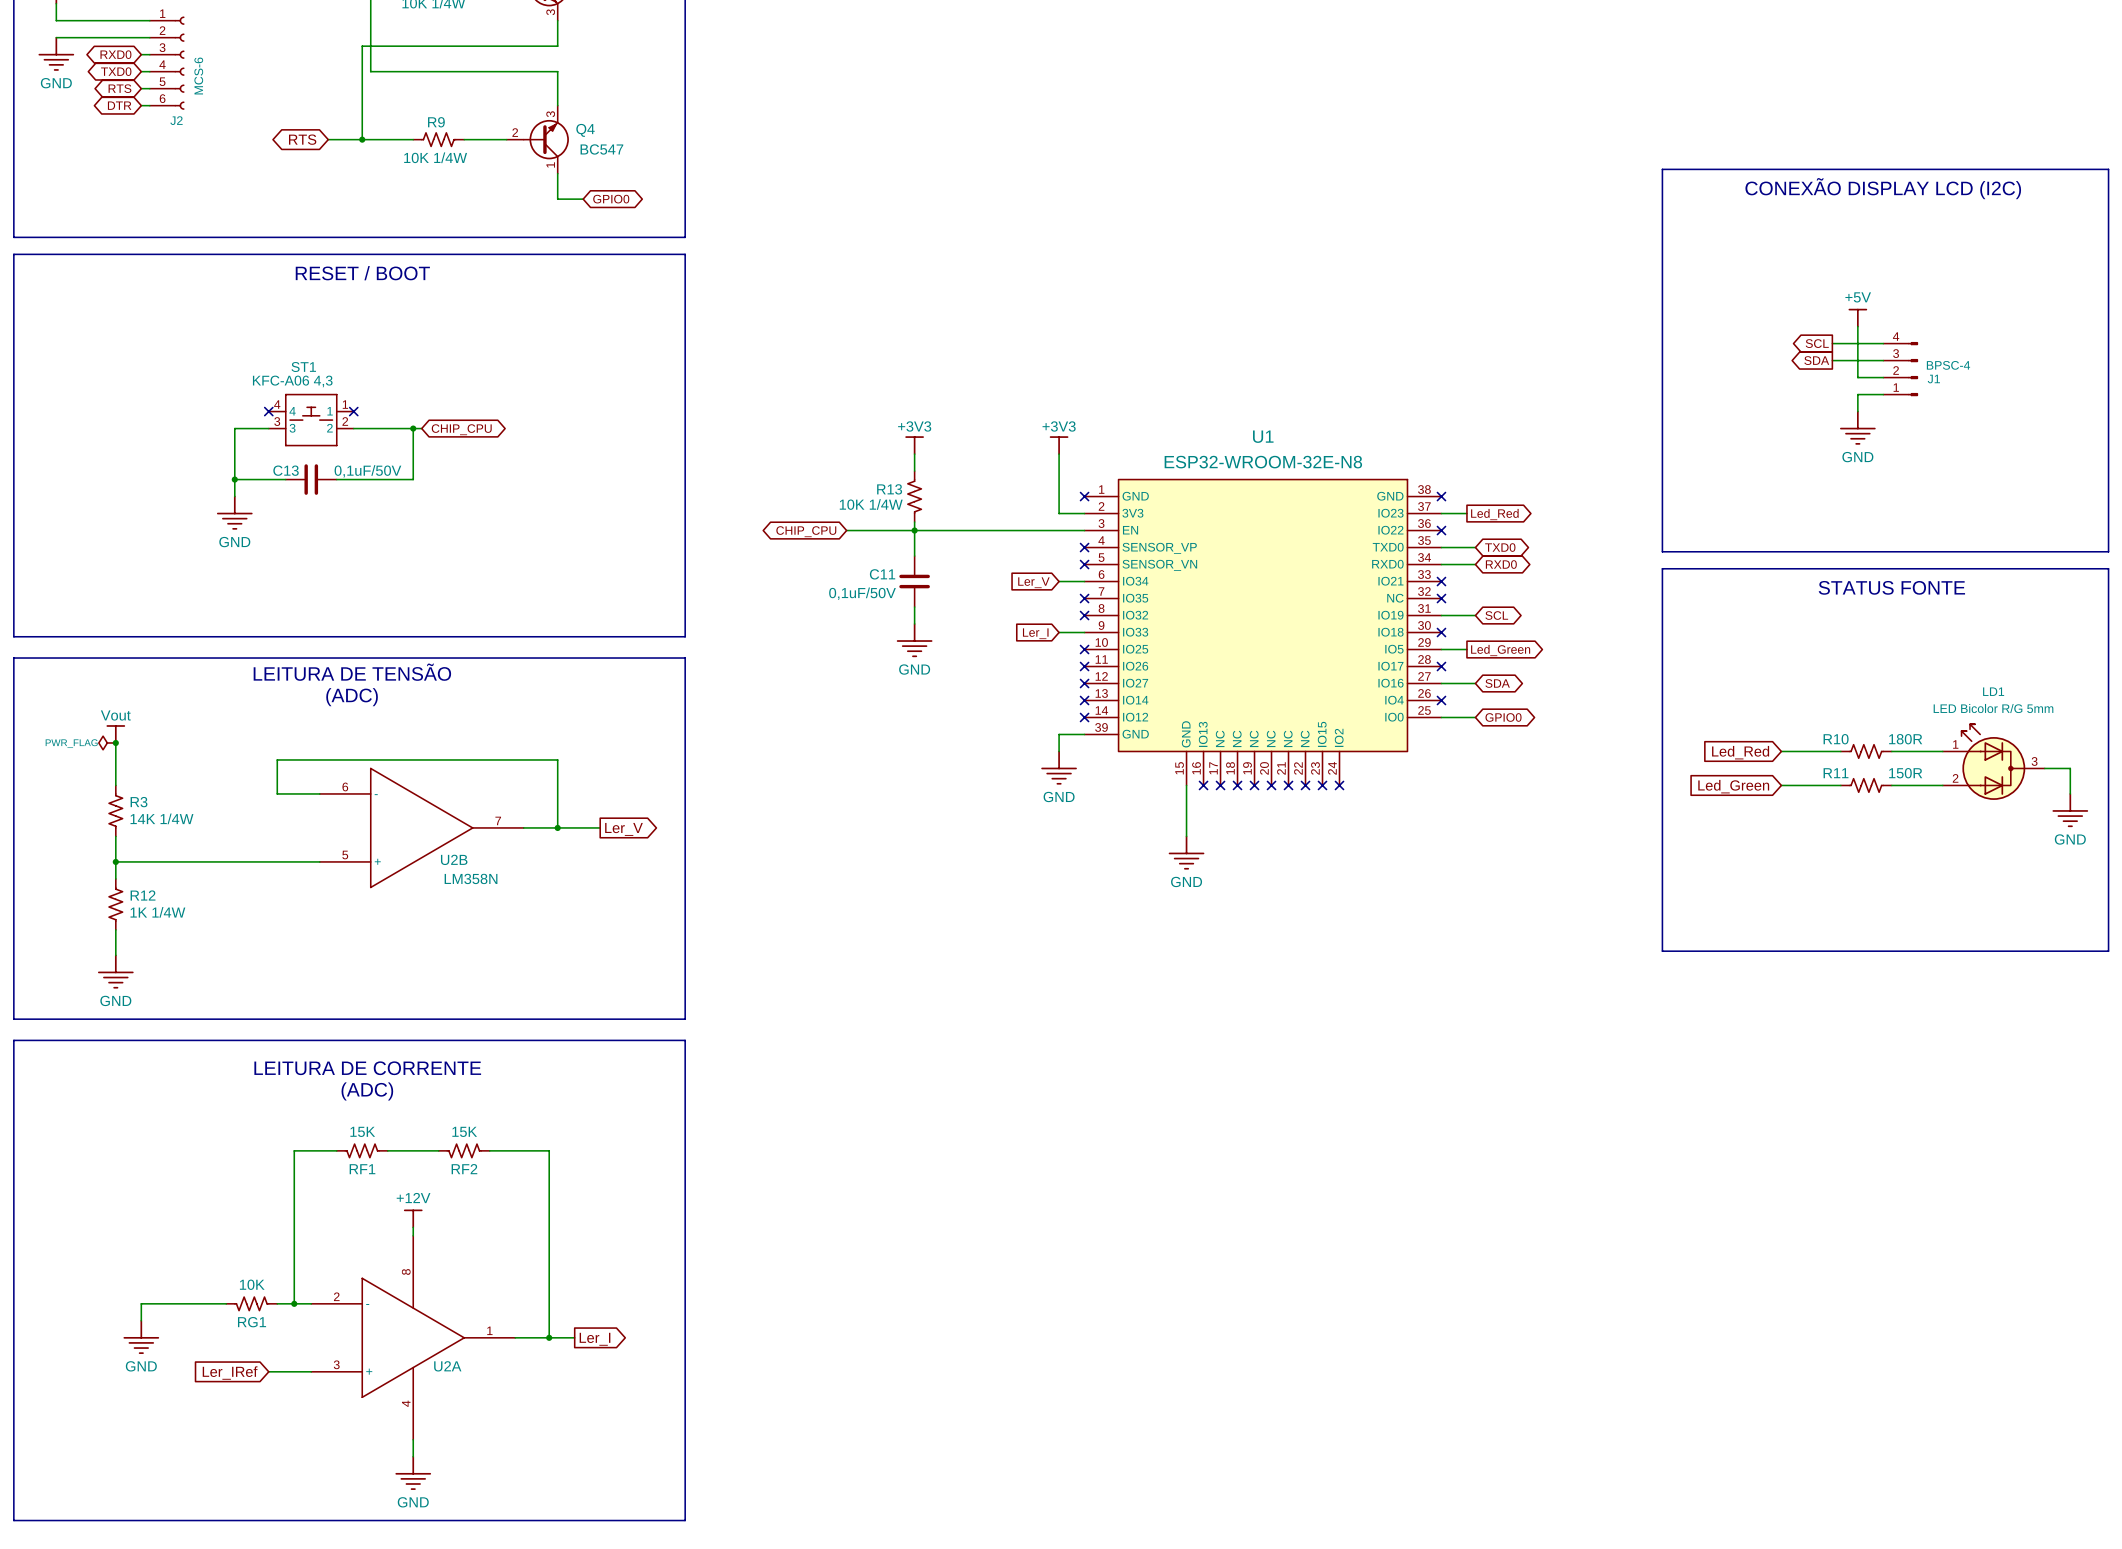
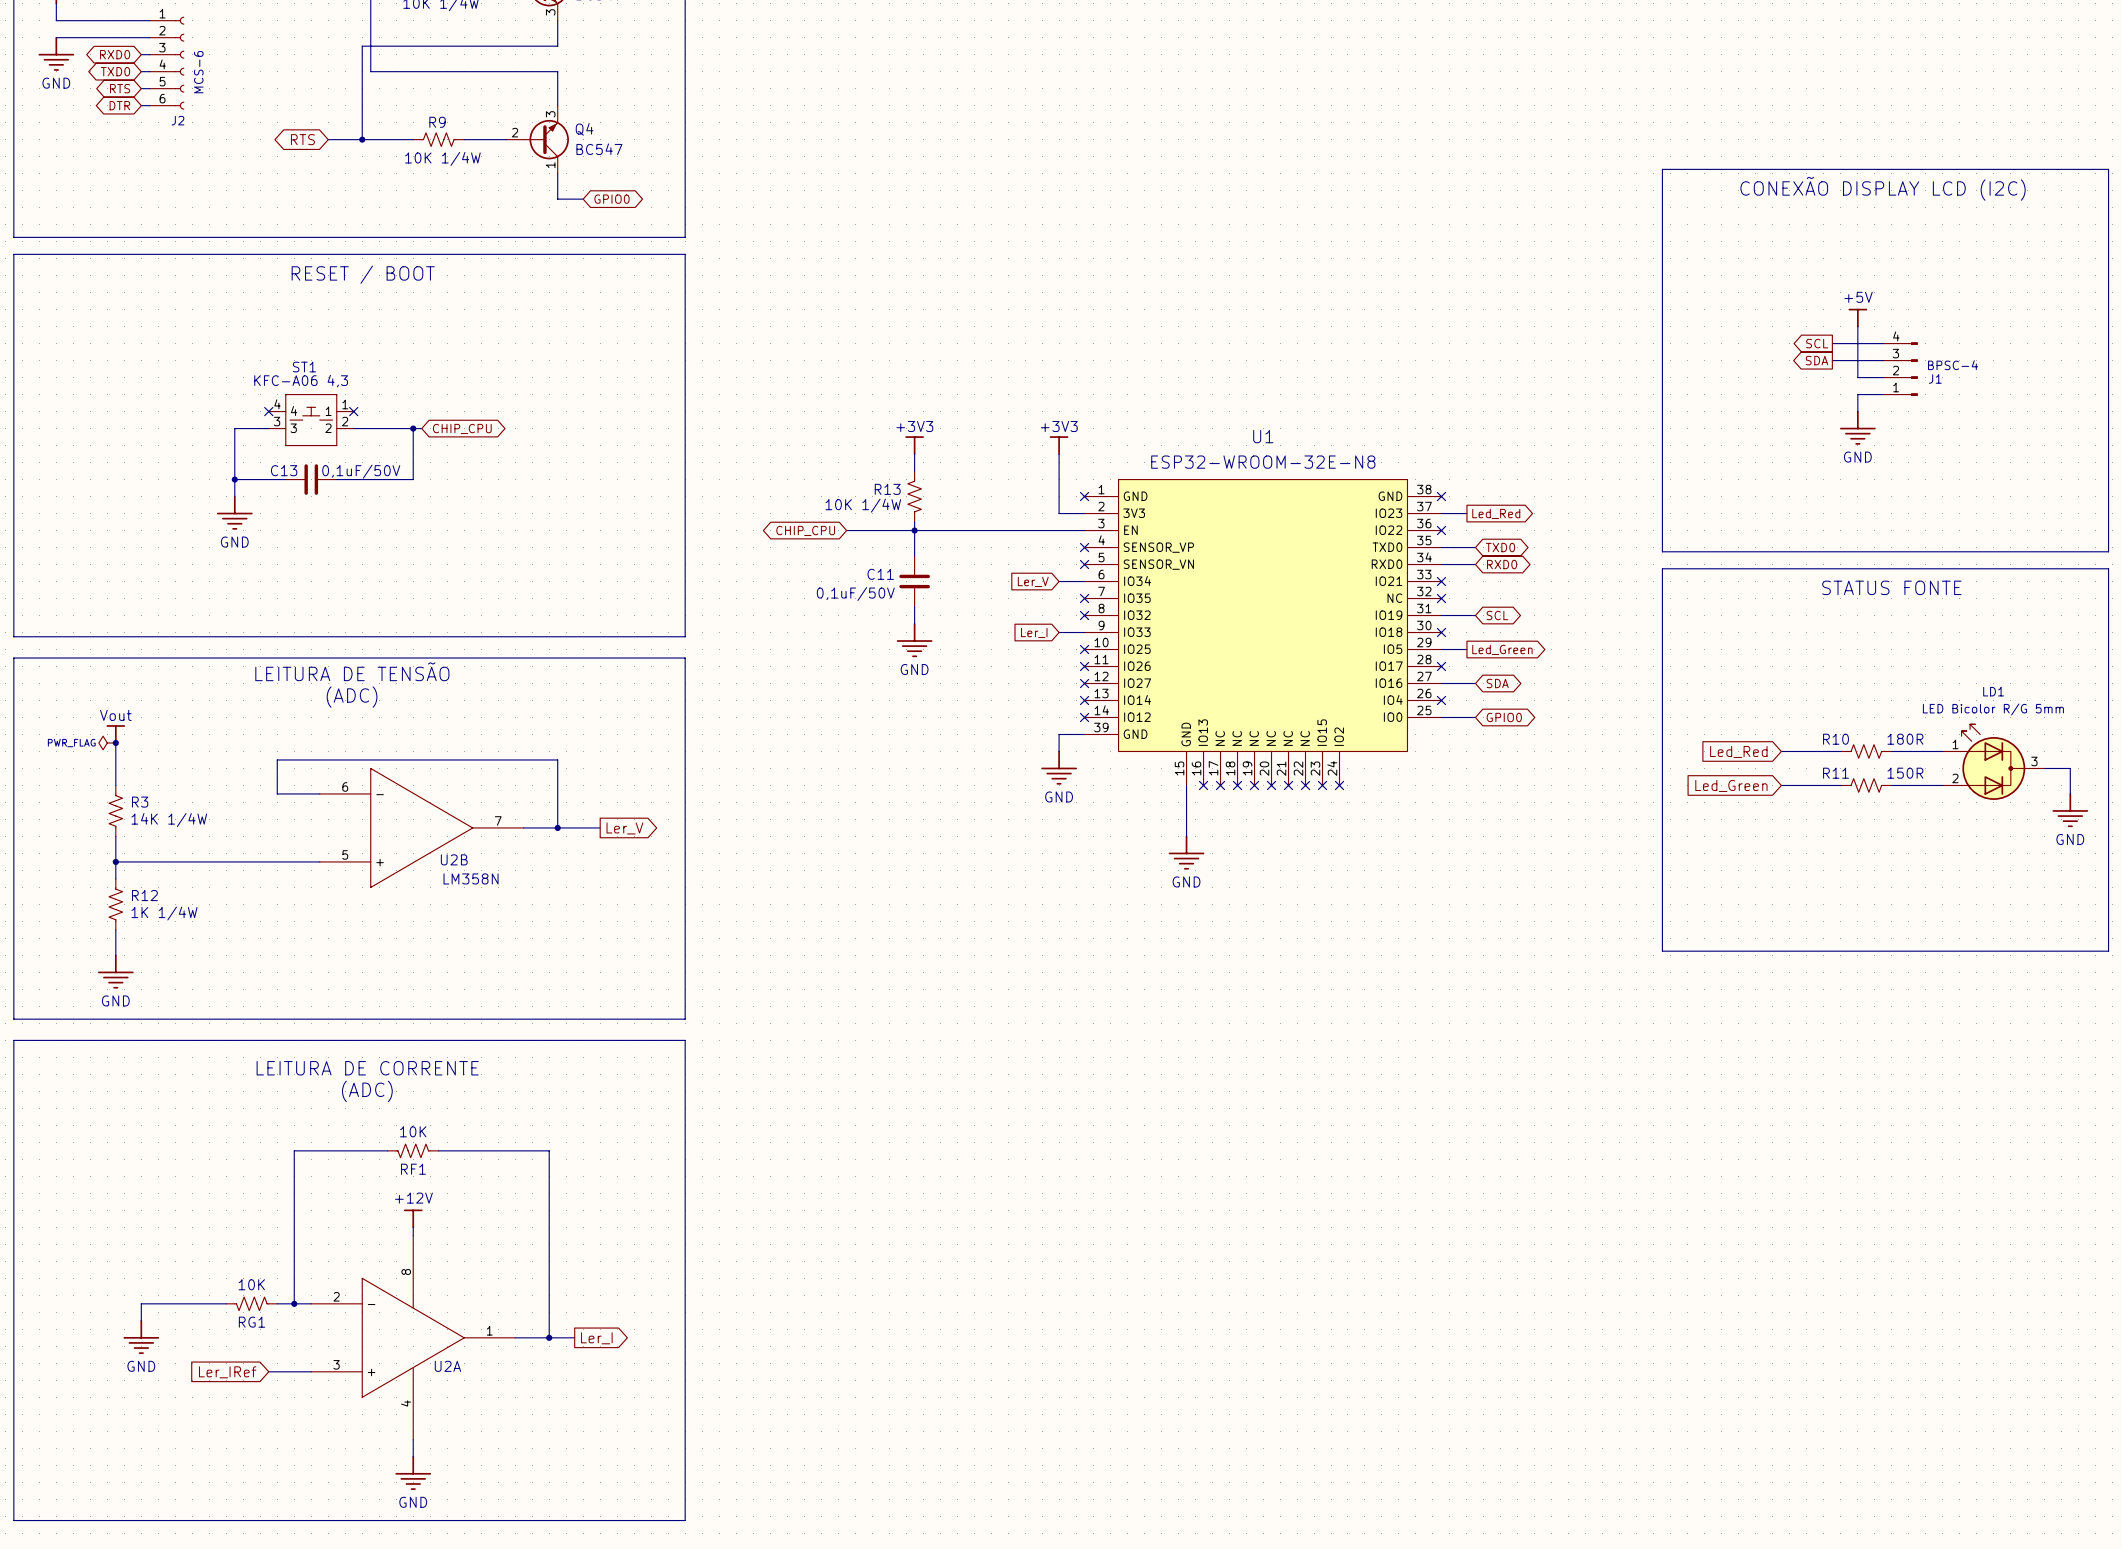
RF1 value: 15K (362, 1131) -> 10K (413, 1131)
RF1 position: (362, 1150) -> (413, 1150)
RF2: 15K (464, 1150) -> none

